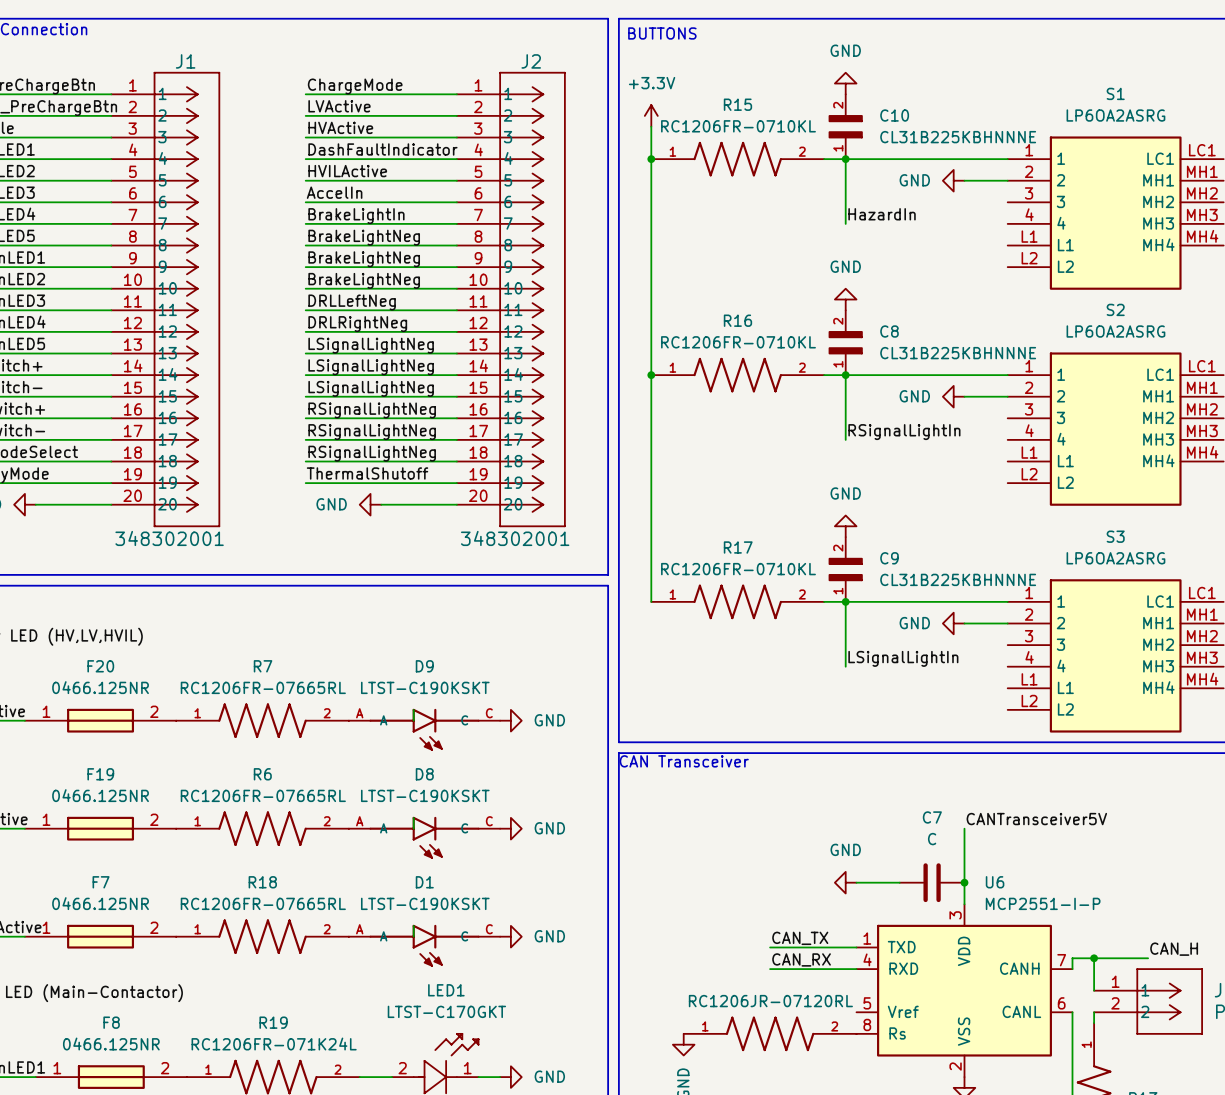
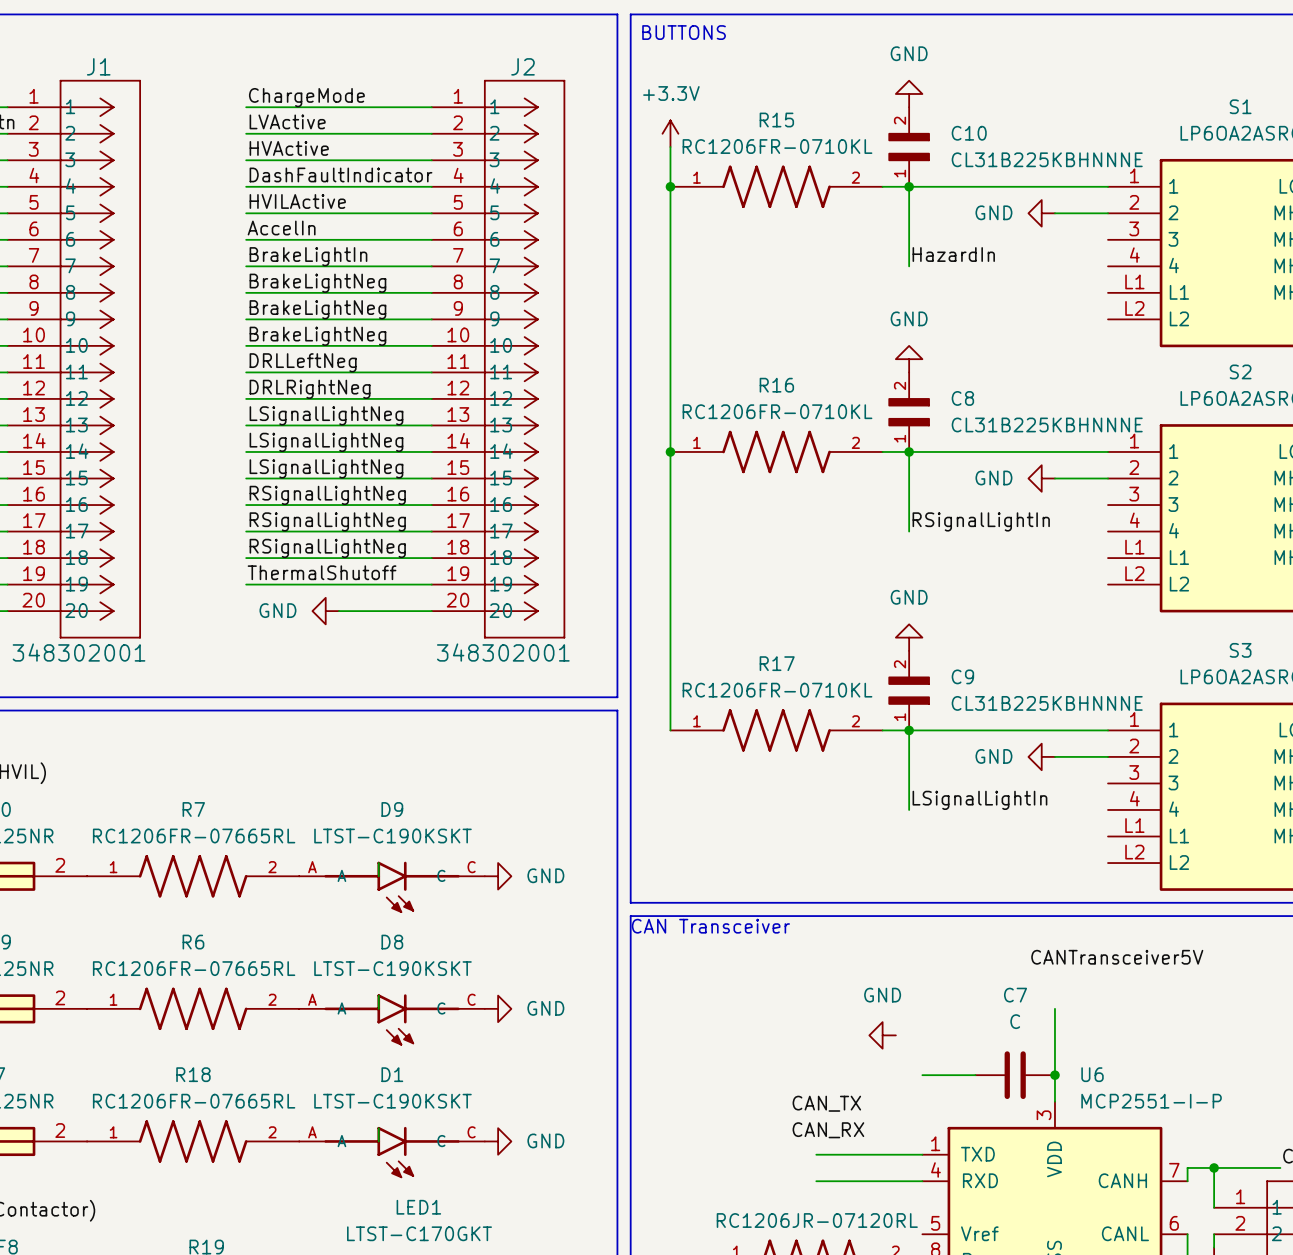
label position: CANTransceiver5V (1036, 819) -> CANTransceiver5V (1117, 957)
power symbol position: GND (845, 882) -> GND (882, 1035)
label position: CAN_TX (800, 938) -> CAN_TX (826, 1103)
label position: CAN_RX (801, 959) -> CAN_RX (828, 1130)

